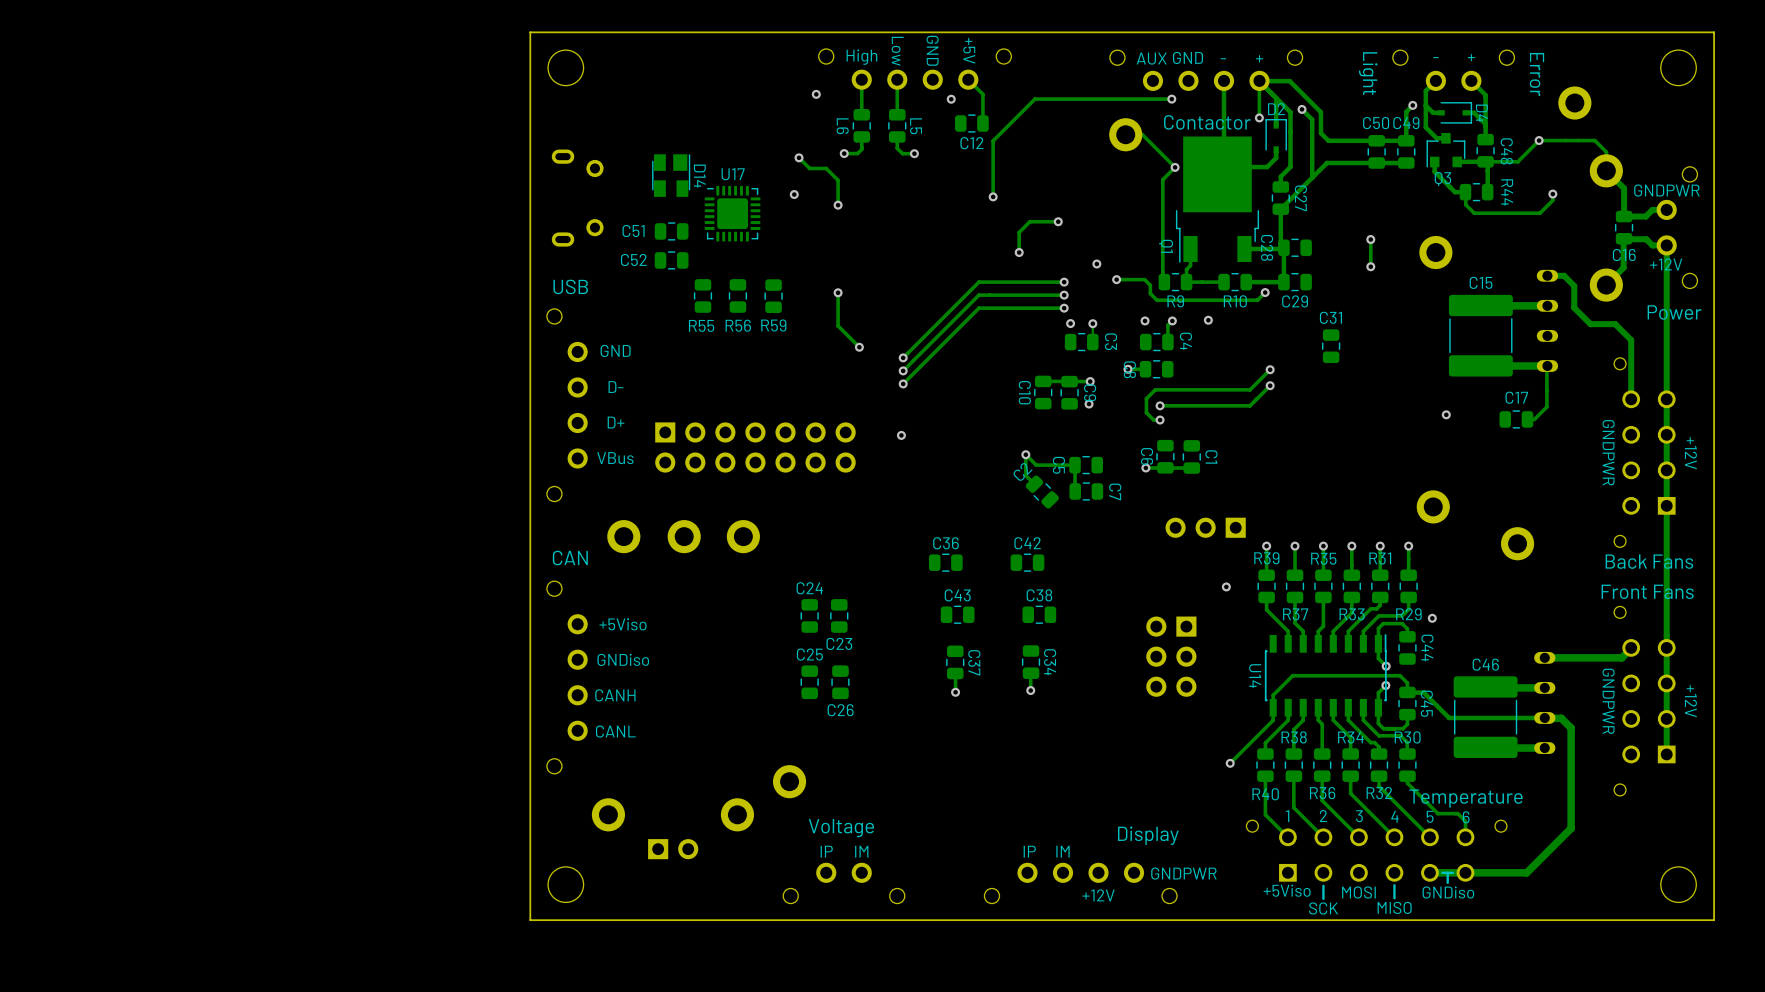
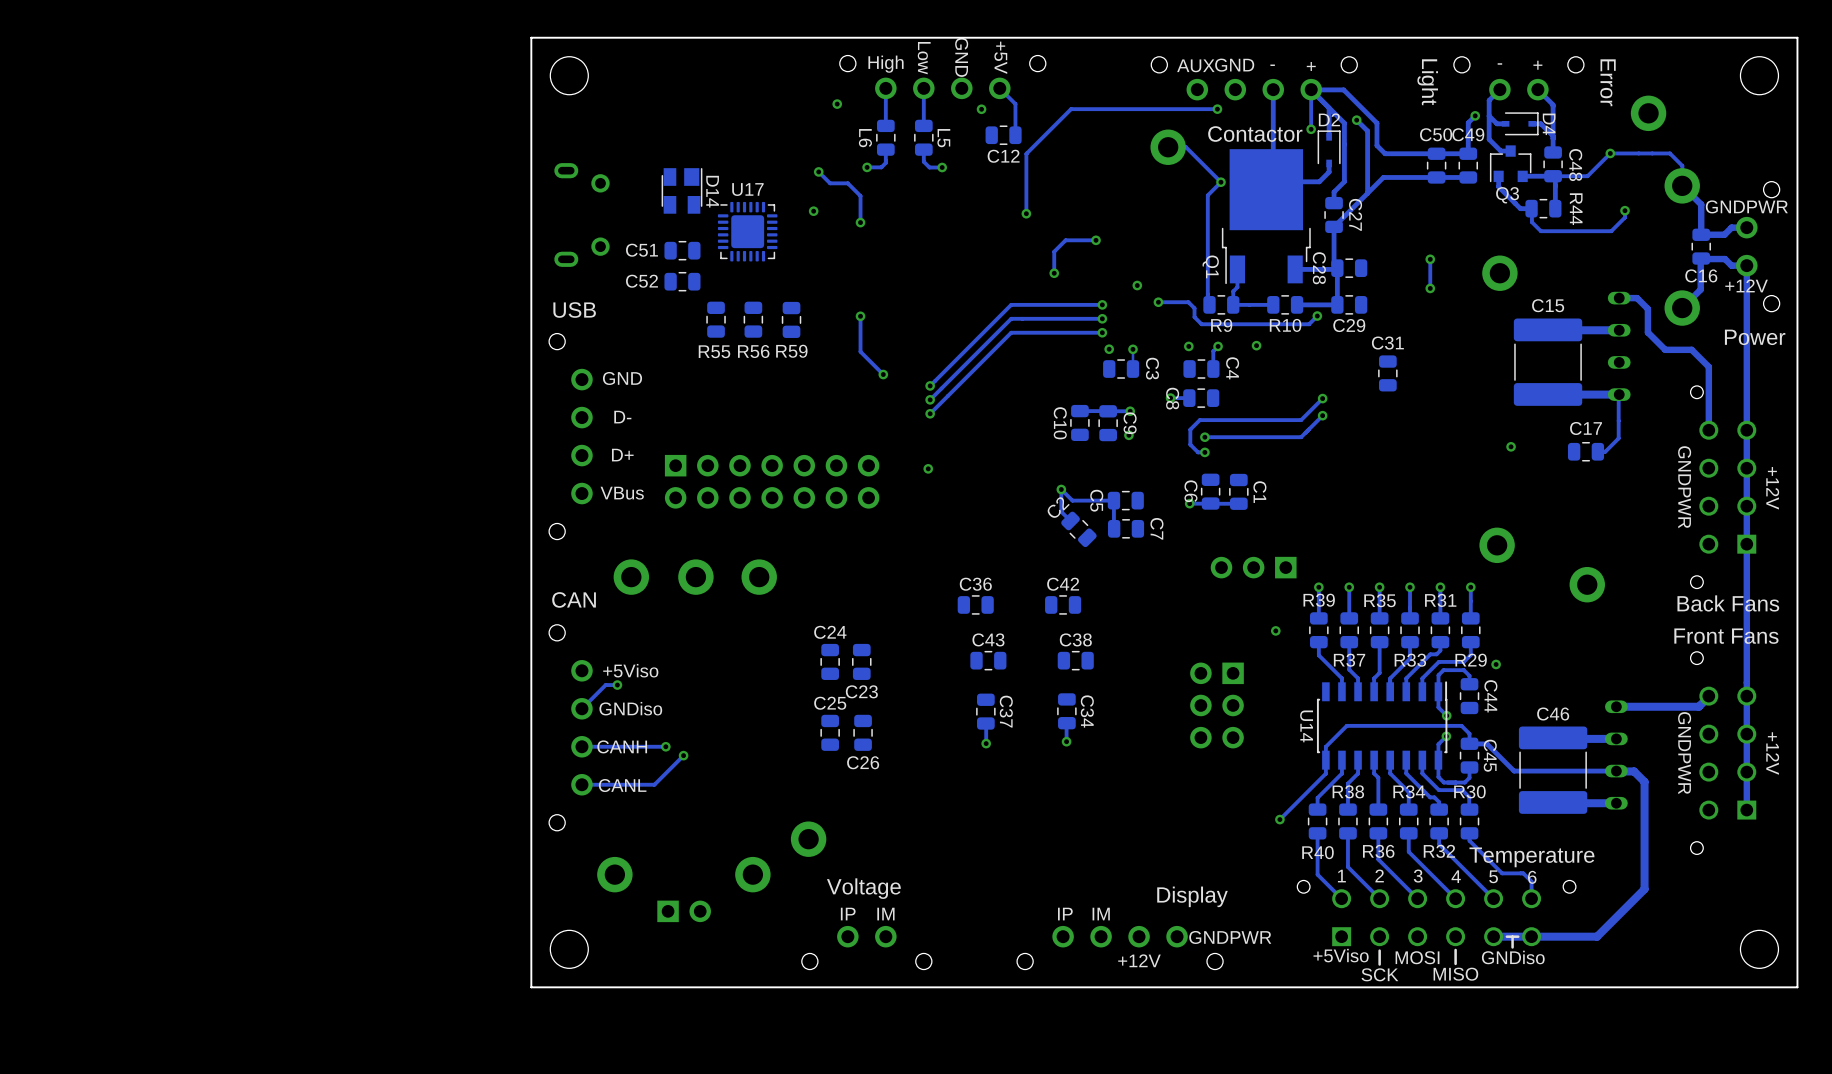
track: none -> (617, 685) (605, 685) (581, 708)
via: none -> (617, 685)
track: none -> (665, 746) (581, 746)
via: none -> (665, 746)
track: none -> (683, 755) (654, 784) (581, 784)
via: none -> (683, 755)

